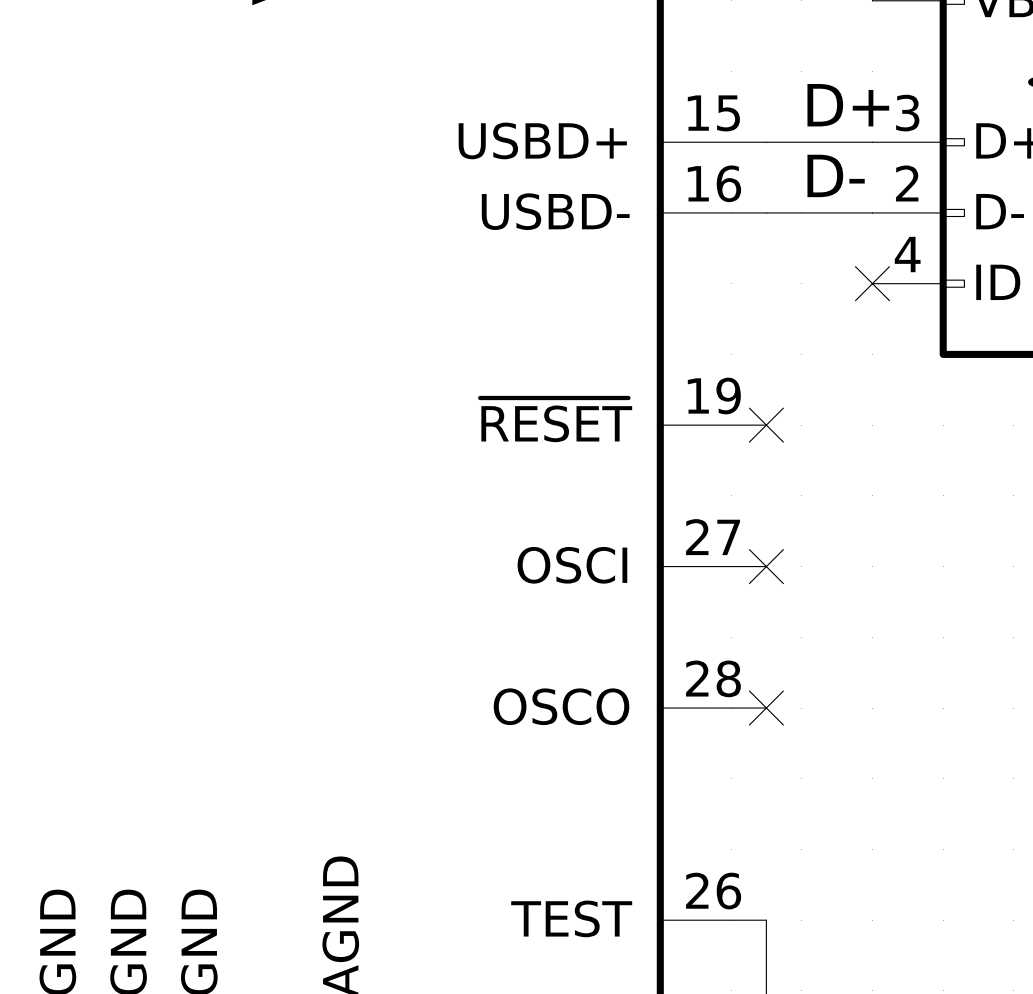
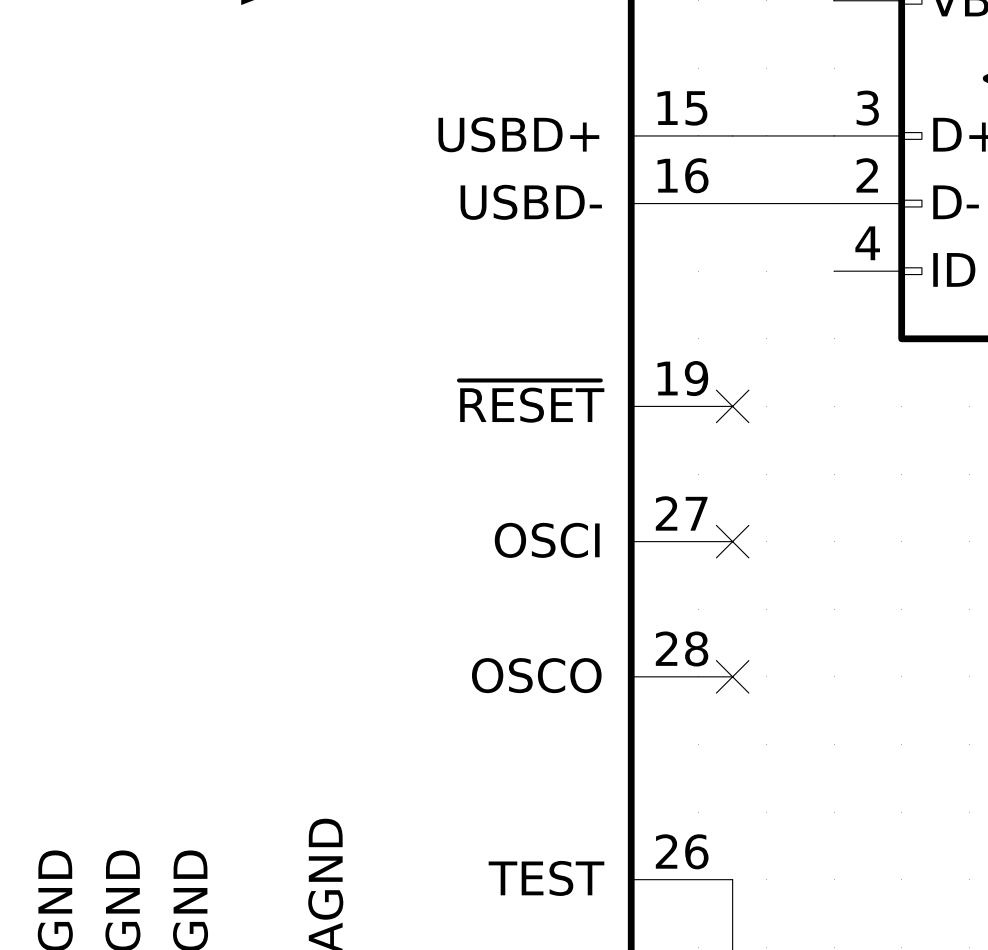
label: D+ (848, 105) -> none
label: D- (836, 175) -> none
no-connect mark: (872, 283) -> none

